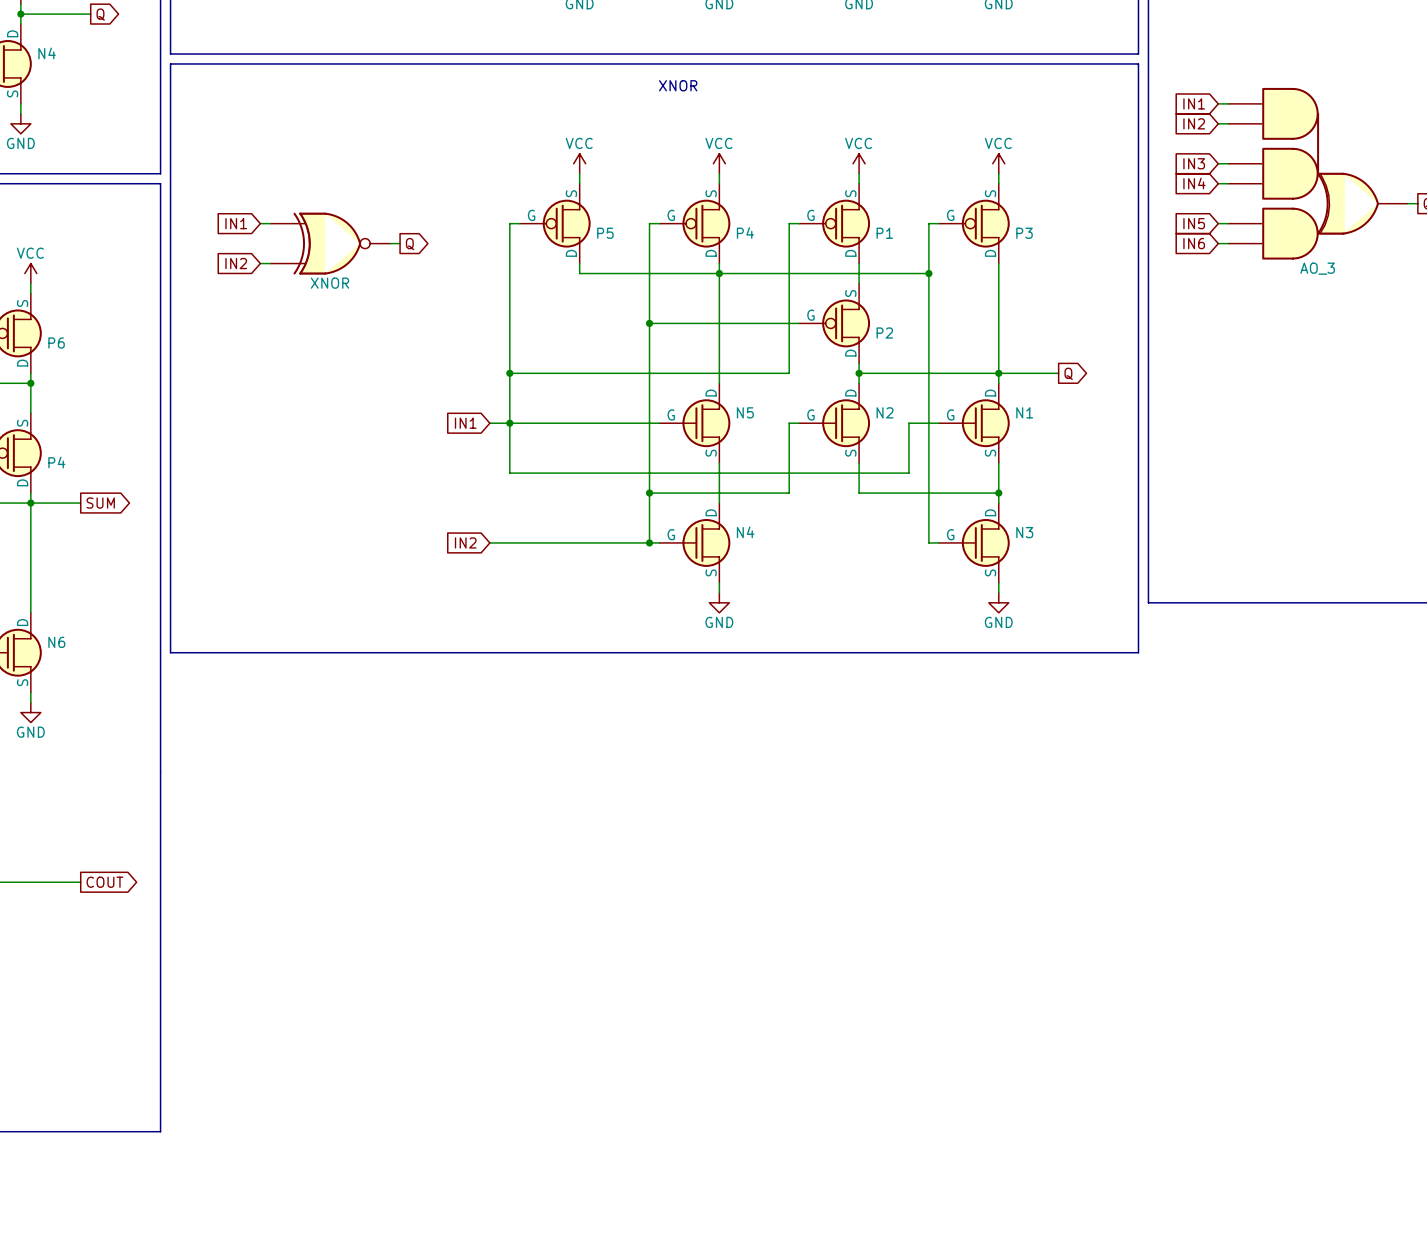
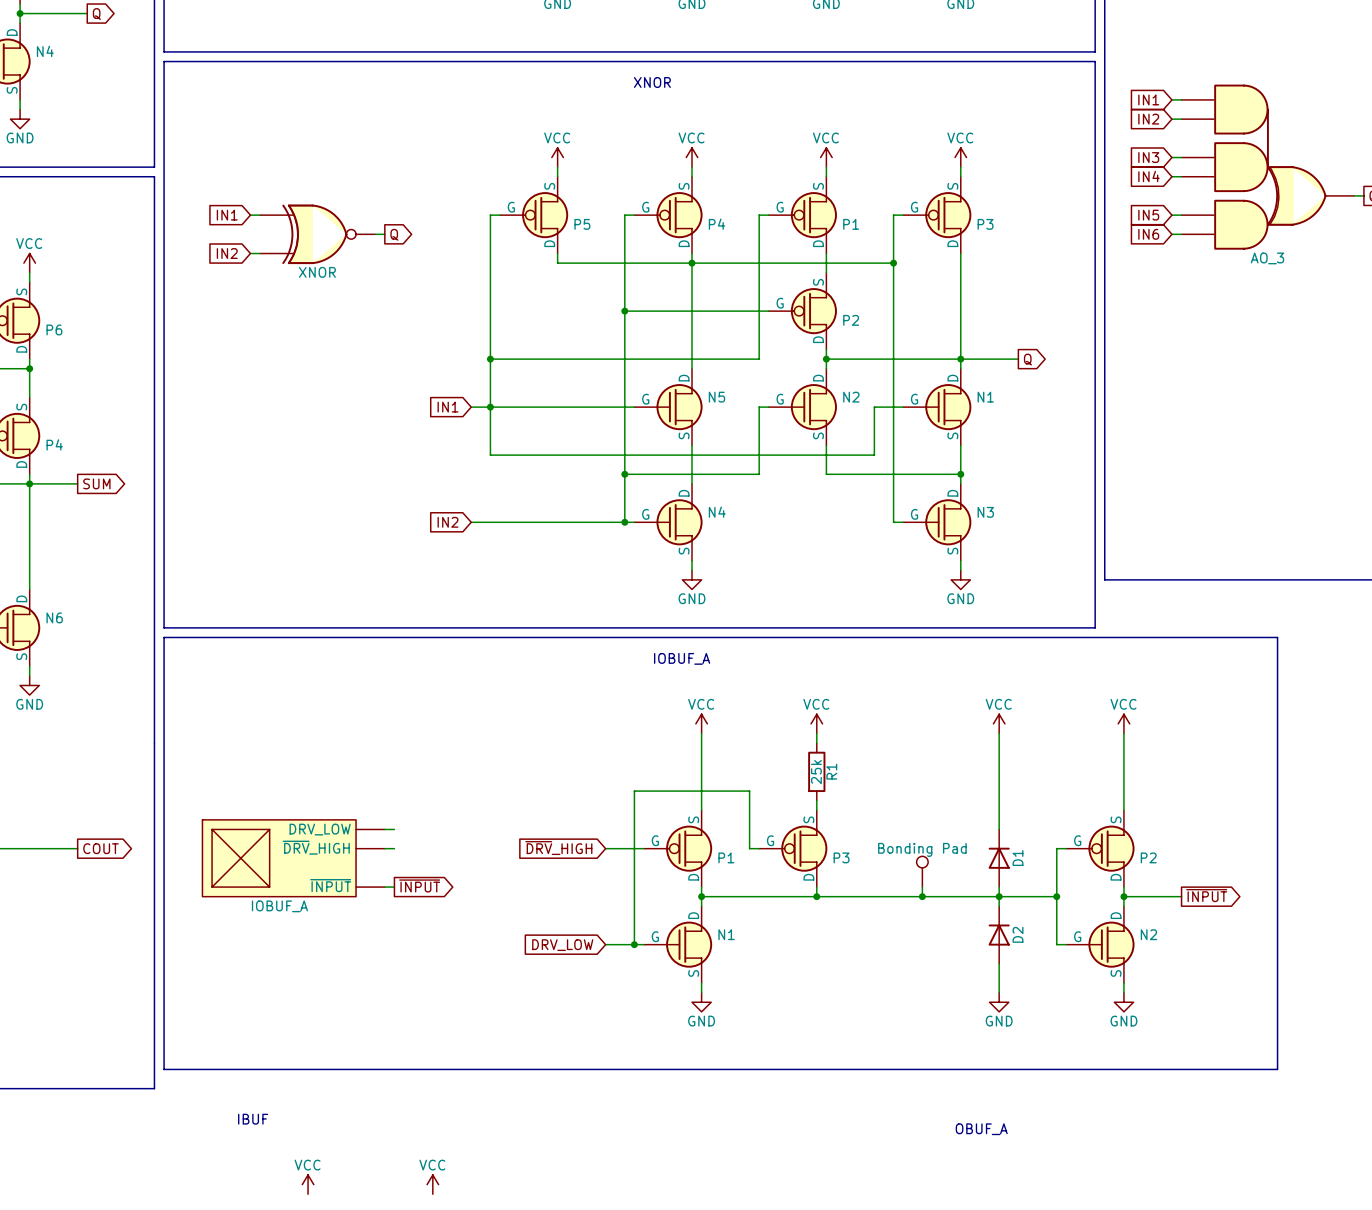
line: none -> (164, 637) (1277, 637) (1277, 1069) (164, 1069) (164, 637)
text: none -> IOBUF_A (682, 658)
power symbol: none -> VCC (701, 723)
power symbol: none -> VCC (816, 723)
power symbol: none -> VCC (999, 723)
power symbol: none -> VCC (1123, 723)
wire: none -> (701, 733) (701, 810)
wire: none -> (816, 733) (816, 743)
wire: none -> (999, 733) (999, 829)
wire: none -> (1123, 733) (1123, 810)
R1: none -> 25k (816, 771)
wire: none -> (816, 800) (816, 810)
wire: none -> (384, 829) (394, 829)
global label: none -> ~{DRV}_HIGH (558, 848)
wire: none -> (384, 848) (394, 848)
wire: none -> (605, 848) (644, 848)
P1: none -> (678, 848)
wire: none -> (759, 848) (749, 848) (749, 791) (634, 791) (634, 944)
P3: none -> (793, 848)
wire: none -> (1066, 848) (1056, 848) (1056, 944) (1066, 944)
P2: none -> (1100, 848)
part: none -> IOBUF_A (293, 858)
D1: none -> (999, 858)
part: none -> Bonding Pad (922, 871)
global label: none -> ~{INPUT} (419, 885)
wire: none -> (384, 887) (394, 887)
wire: none -> (701, 887) (701, 906)
wire: none -> (816, 887) (816, 896)
wire: none -> (922, 887) (922, 896)
wire: none -> (999, 887) (999, 906)
wire: none -> (1123, 887) (1123, 906)
global label: none -> ~{INPUT} (1206, 895)
wire: none -> (701, 896) (1056, 896)
junction: none -> (701, 896)
junction: none -> (816, 896)
junction: none -> (922, 896)
junction: none -> (999, 896)
junction: none -> (1056, 896)
wire: none -> (1123, 896) (1181, 896)
junction: none -> (1123, 896)
D2: none -> (999, 935)
global label: none -> DRV_LOW (562, 945)
wire: none -> (605, 944) (644, 944)
junction: none -> (634, 944)
N1: none -> (678, 944)
N2: none -> (1100, 944)
wire: none -> (999, 963) (999, 992)
wire: none -> (701, 983) (701, 992)
wire: none -> (1123, 983) (1123, 992)
power symbol: none -> GND (701, 1002)
power symbol: none -> GND (999, 1002)
power symbol: none -> GND (1123, 1002)
text: none -> IBUF (253, 1119)
text: none -> OBUF_A (981, 1129)
power symbol: none -> VCC (308, 1184)
power symbol: none -> VCC (432, 1184)

